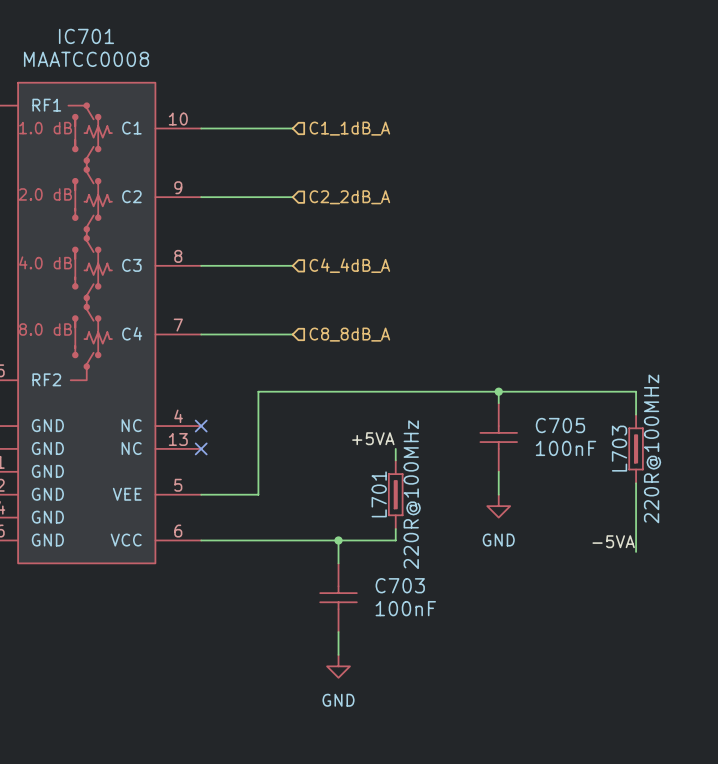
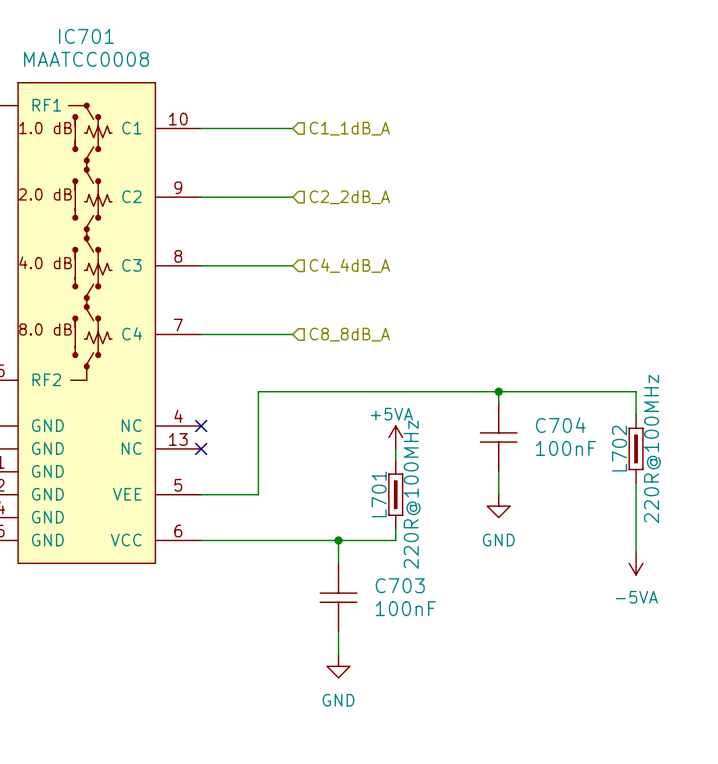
C705 name: C705 (560, 425) -> C704 (560, 425)
power symbol: none -> +5VA (395, 437)
label: +5VA (373, 438) -> none
L703 name: L703 (619, 448) -> L702 (619, 448)
label: -5VA (613, 541) -> none
power symbol: none -> -5VA (636, 563)

